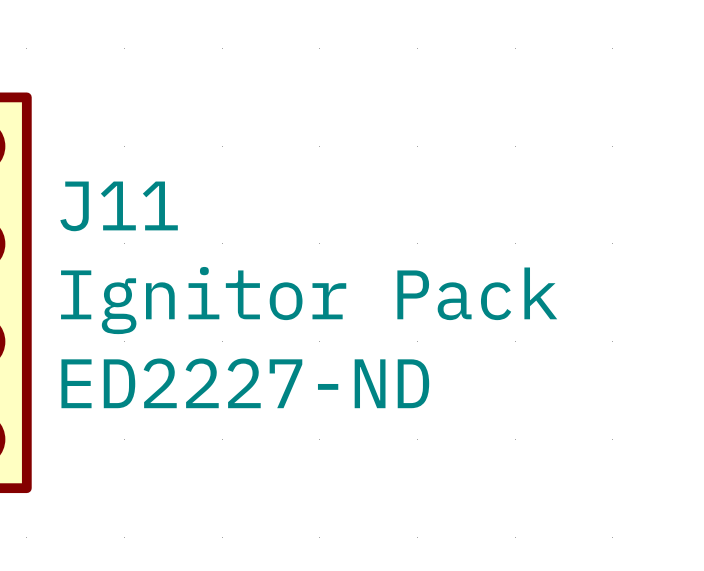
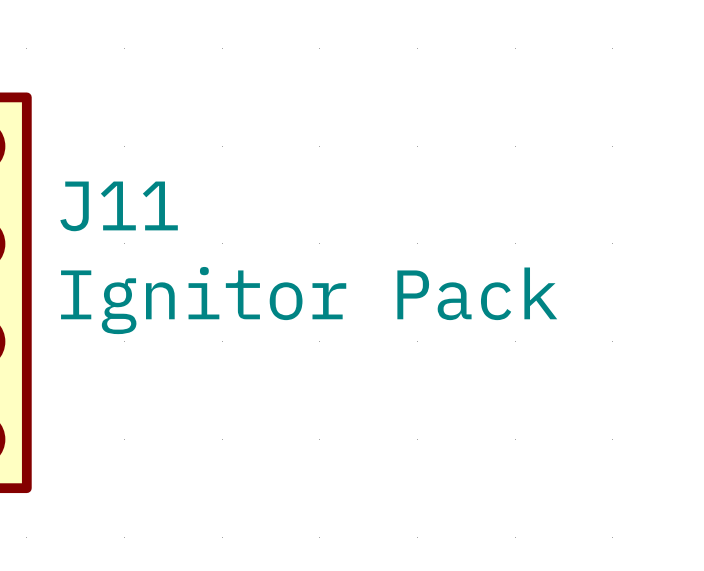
J11 text: ED2227-ND (245, 383) -> none

